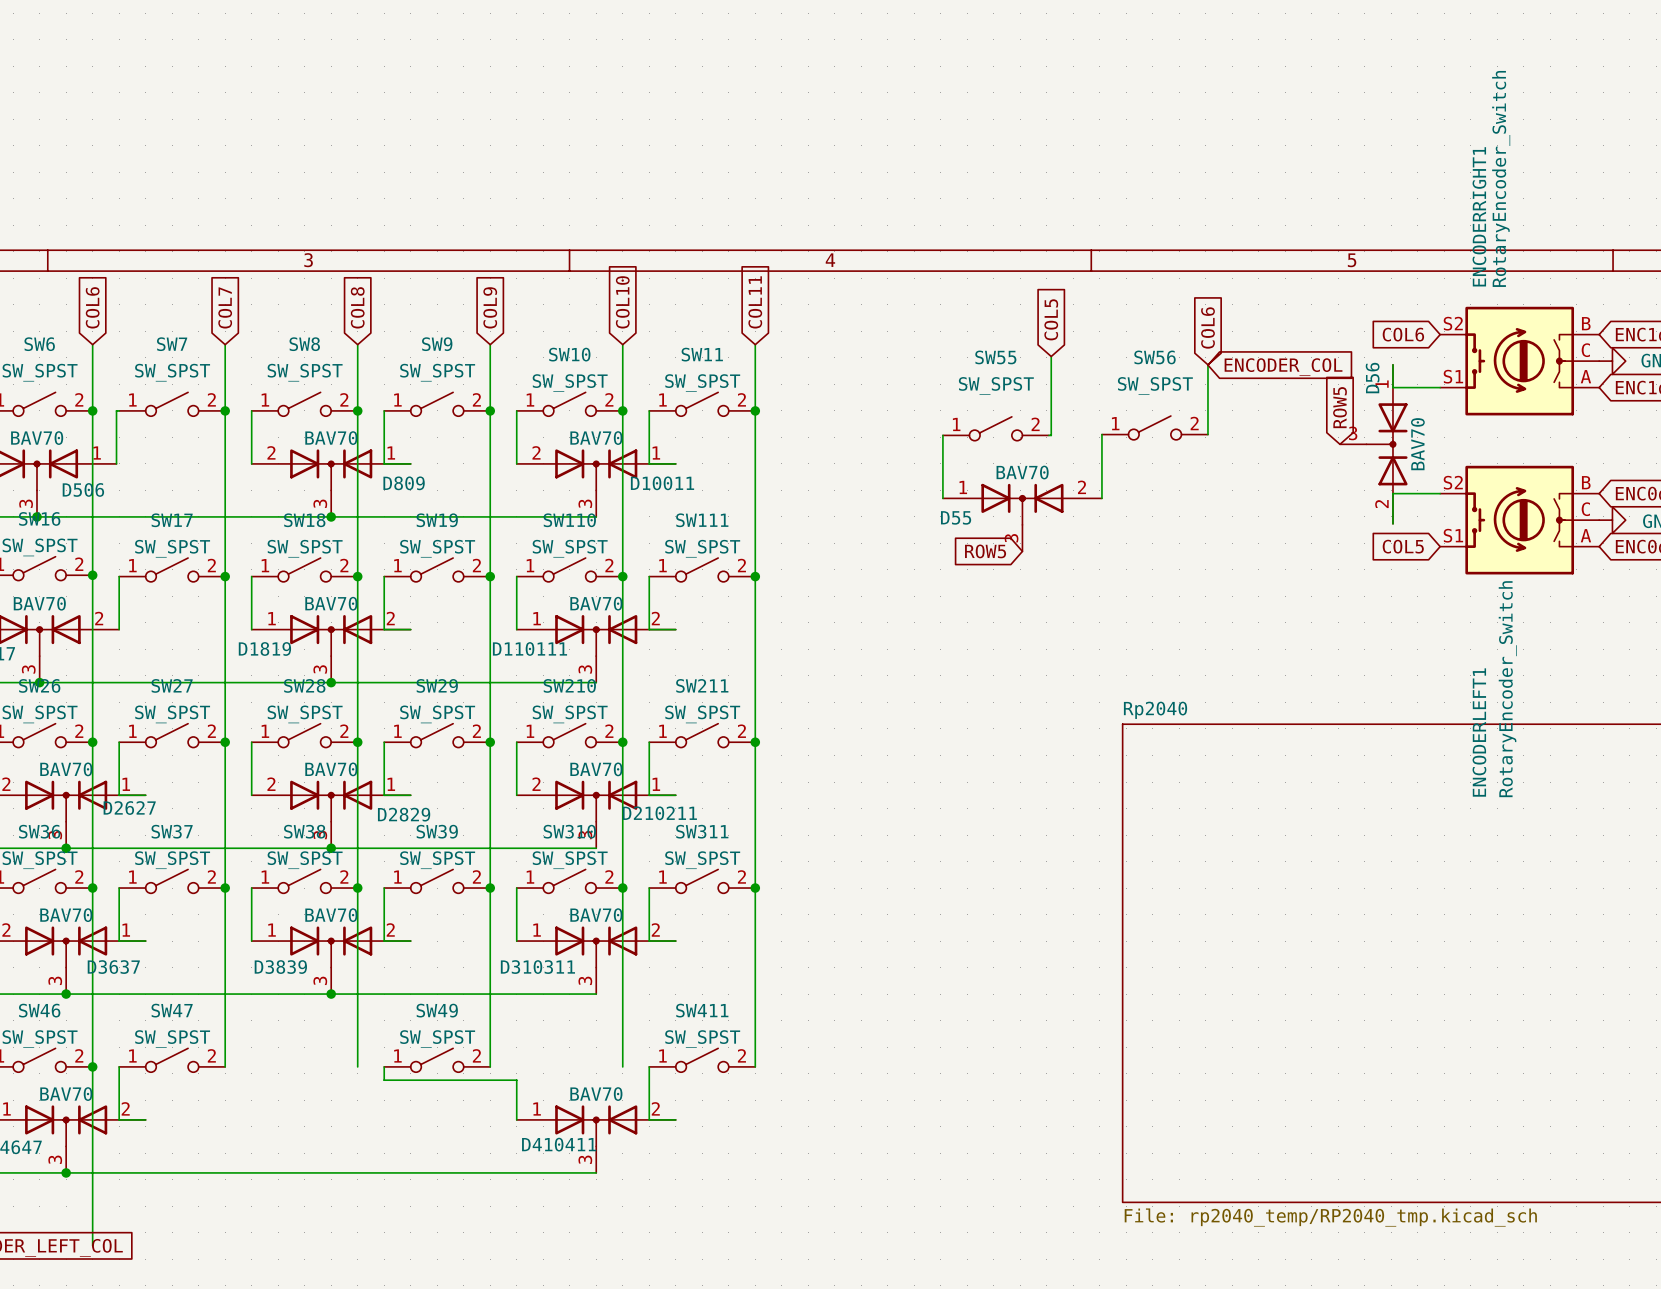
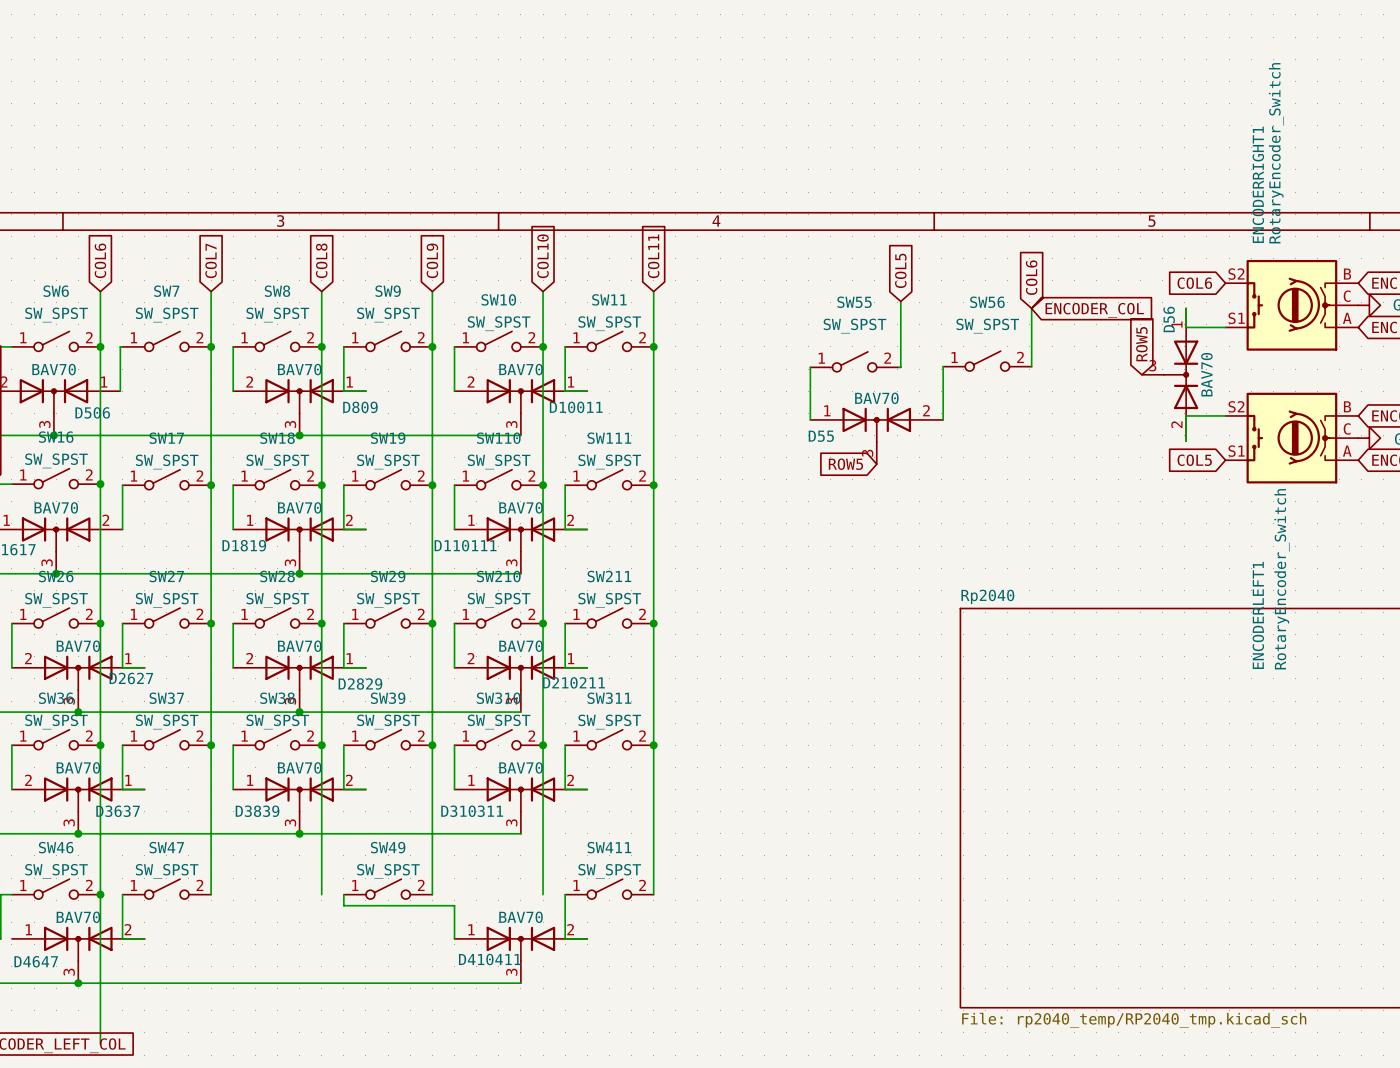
ENCODERRIGHT1 symbol: [1440, 306, 1600, 416] -> [1225, 259, 1359, 351]
ENCODERLEFT1 symbol: [1440, 465, 1600, 575] -> [1225, 392, 1359, 484]

